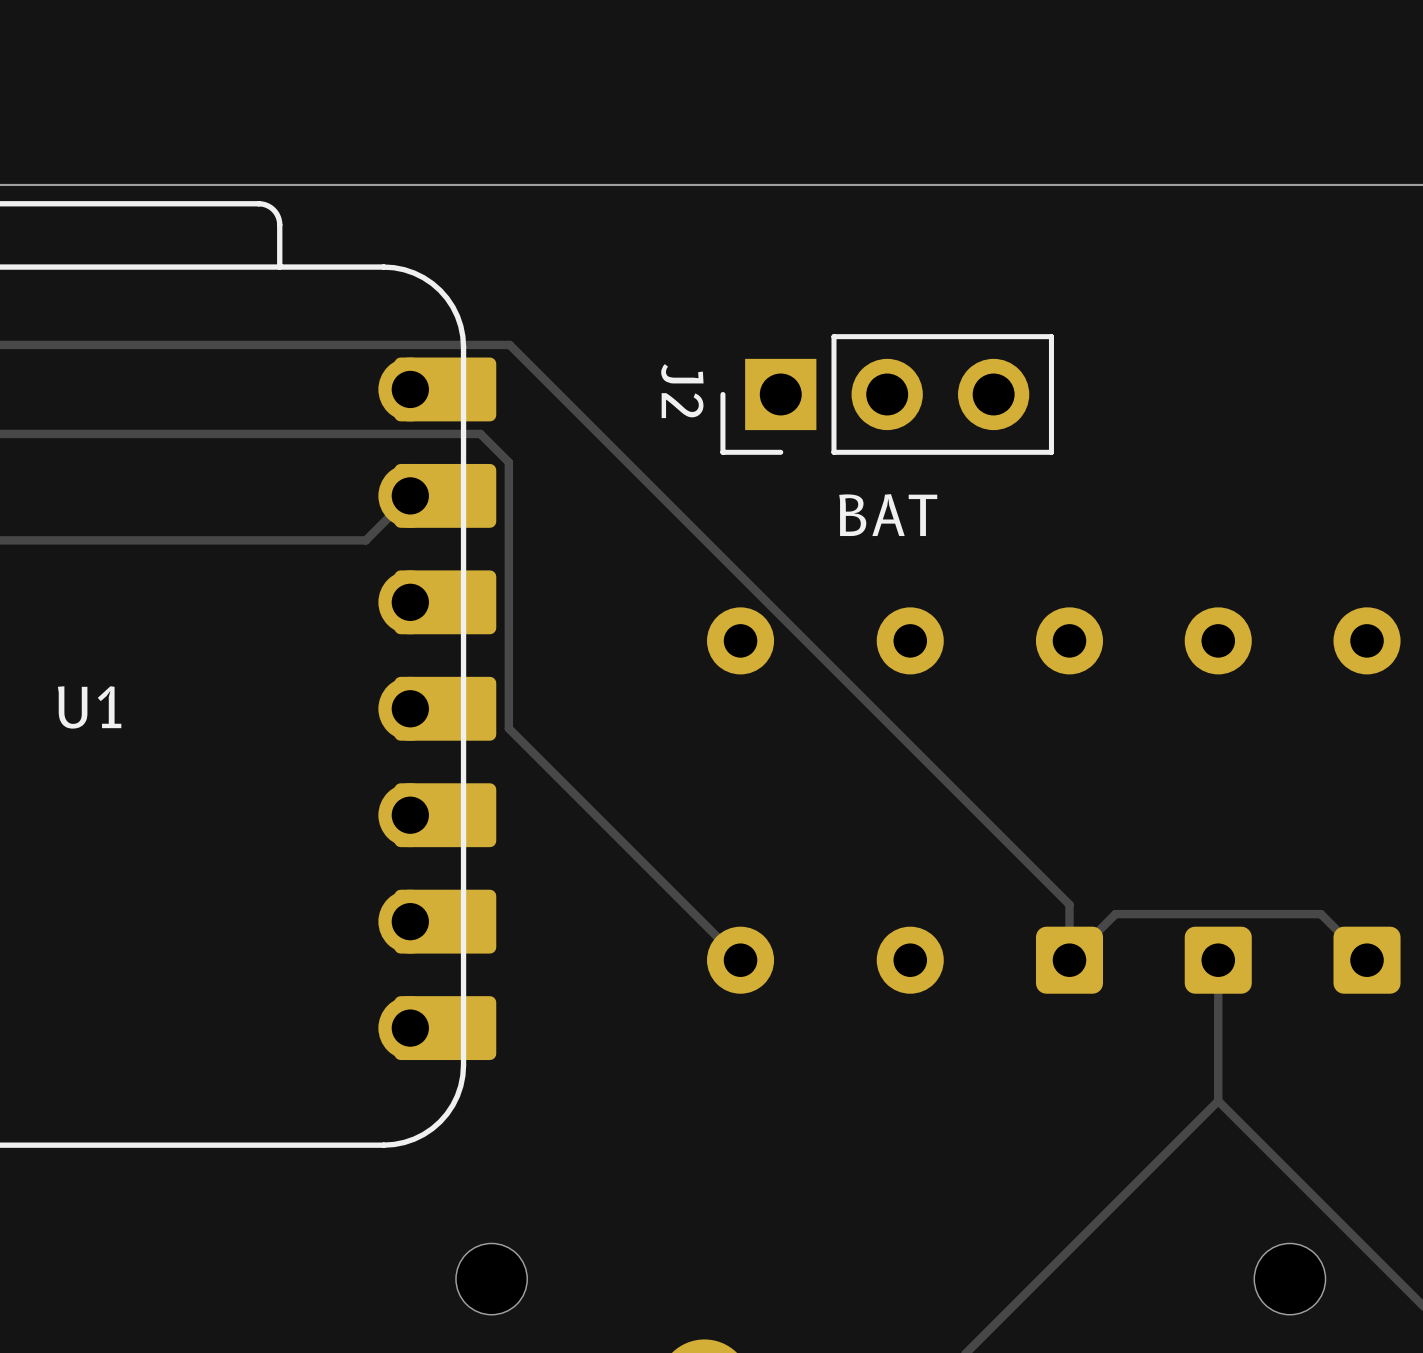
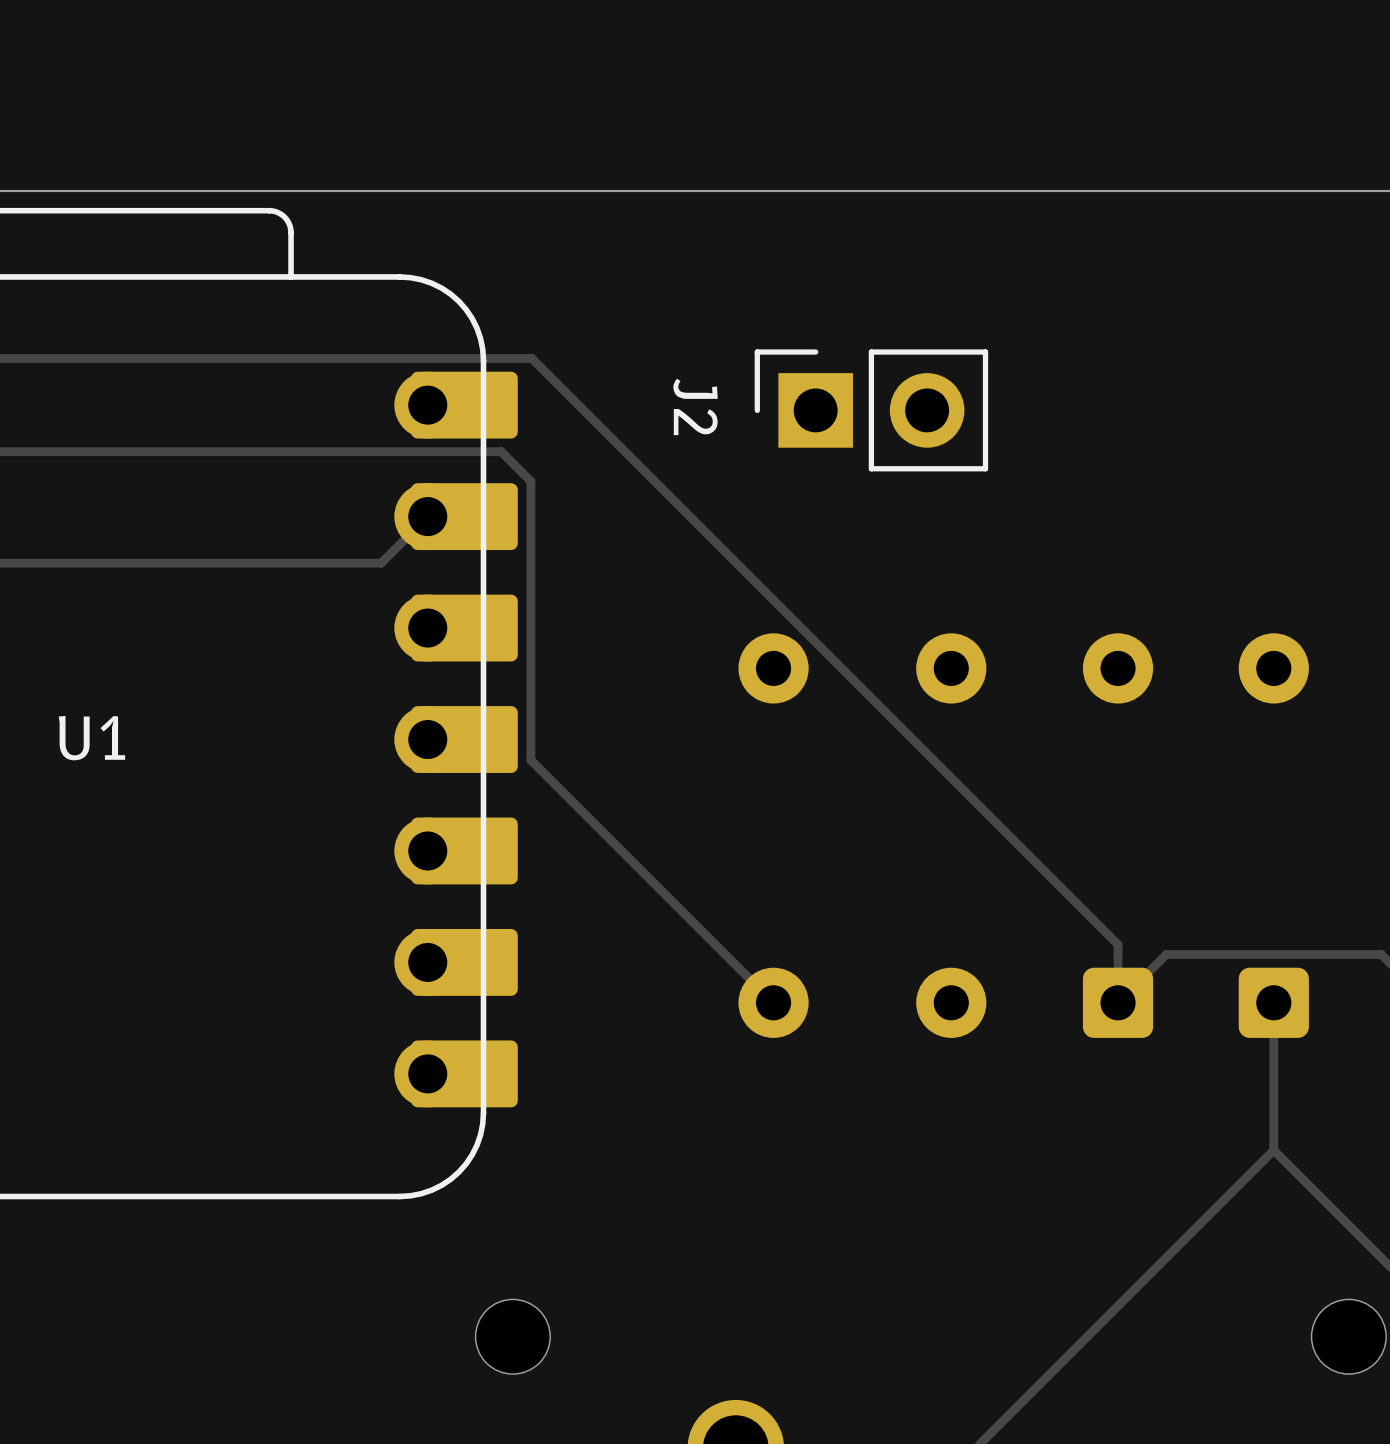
J2 footprint: [720, 334, 1054, 455] -> [754, 349, 989, 472]
text: BAT (888, 515) -> none

